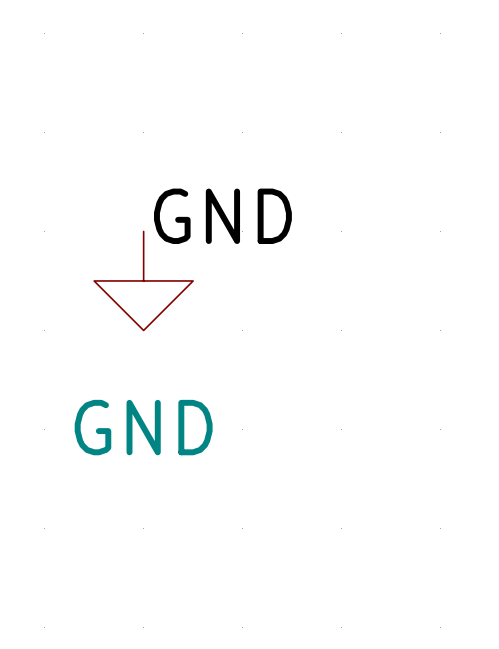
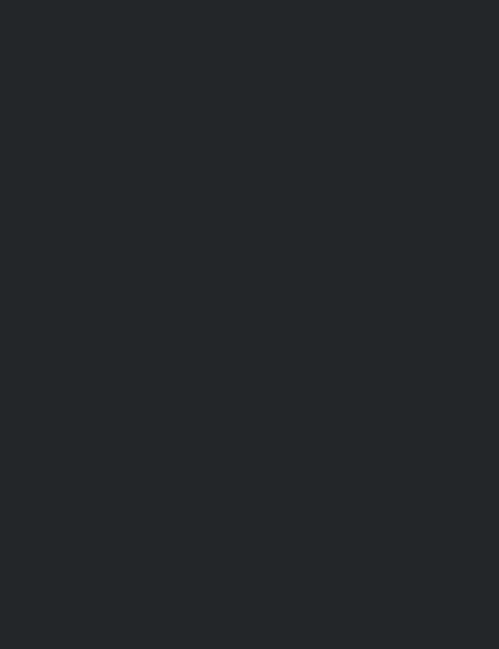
label: GND (222, 216) -> none
power symbol: GND (143, 280) -> none

